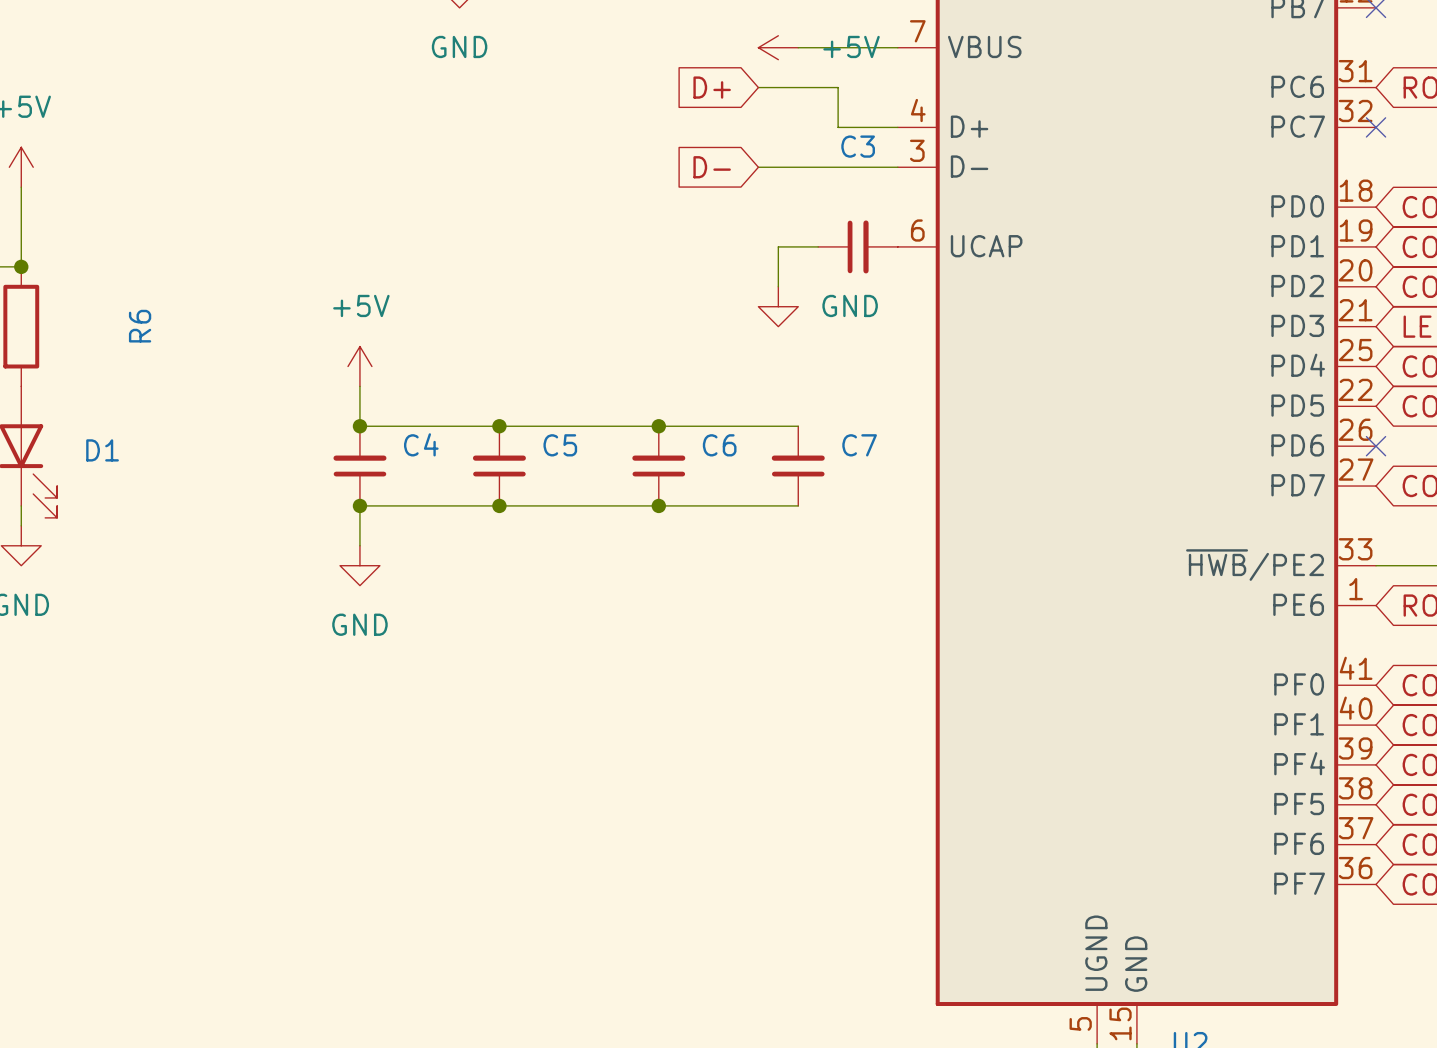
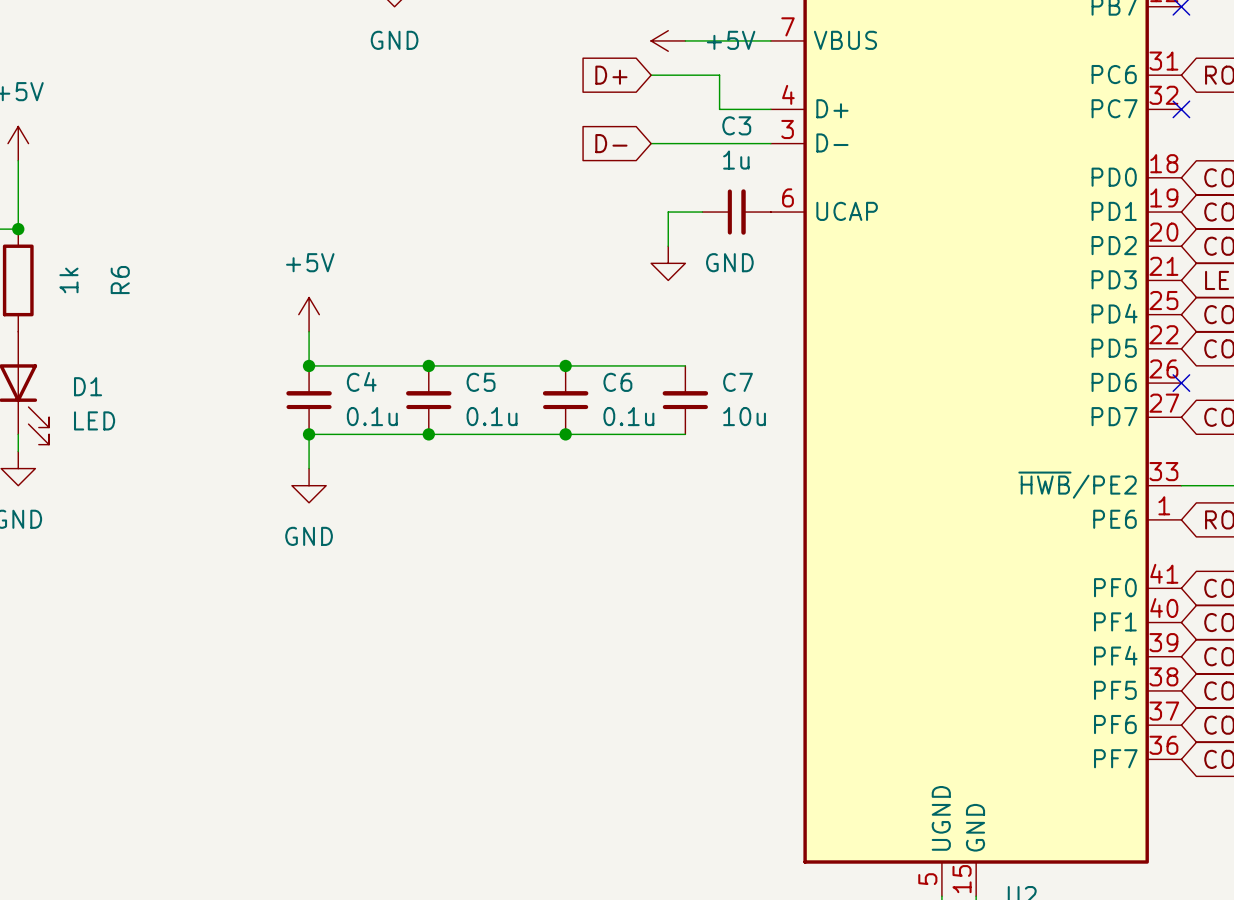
C3 value: none -> 1u (736, 160)
R6 value: none -> 1k (68, 280)
C4 value: none -> 0.1u (372, 416)
C5 value: none -> 0.1u (492, 416)
C6 value: none -> 0.1u (628, 416)
C7 value: none -> 10u (744, 416)
D1 value: none -> LED (94, 420)

